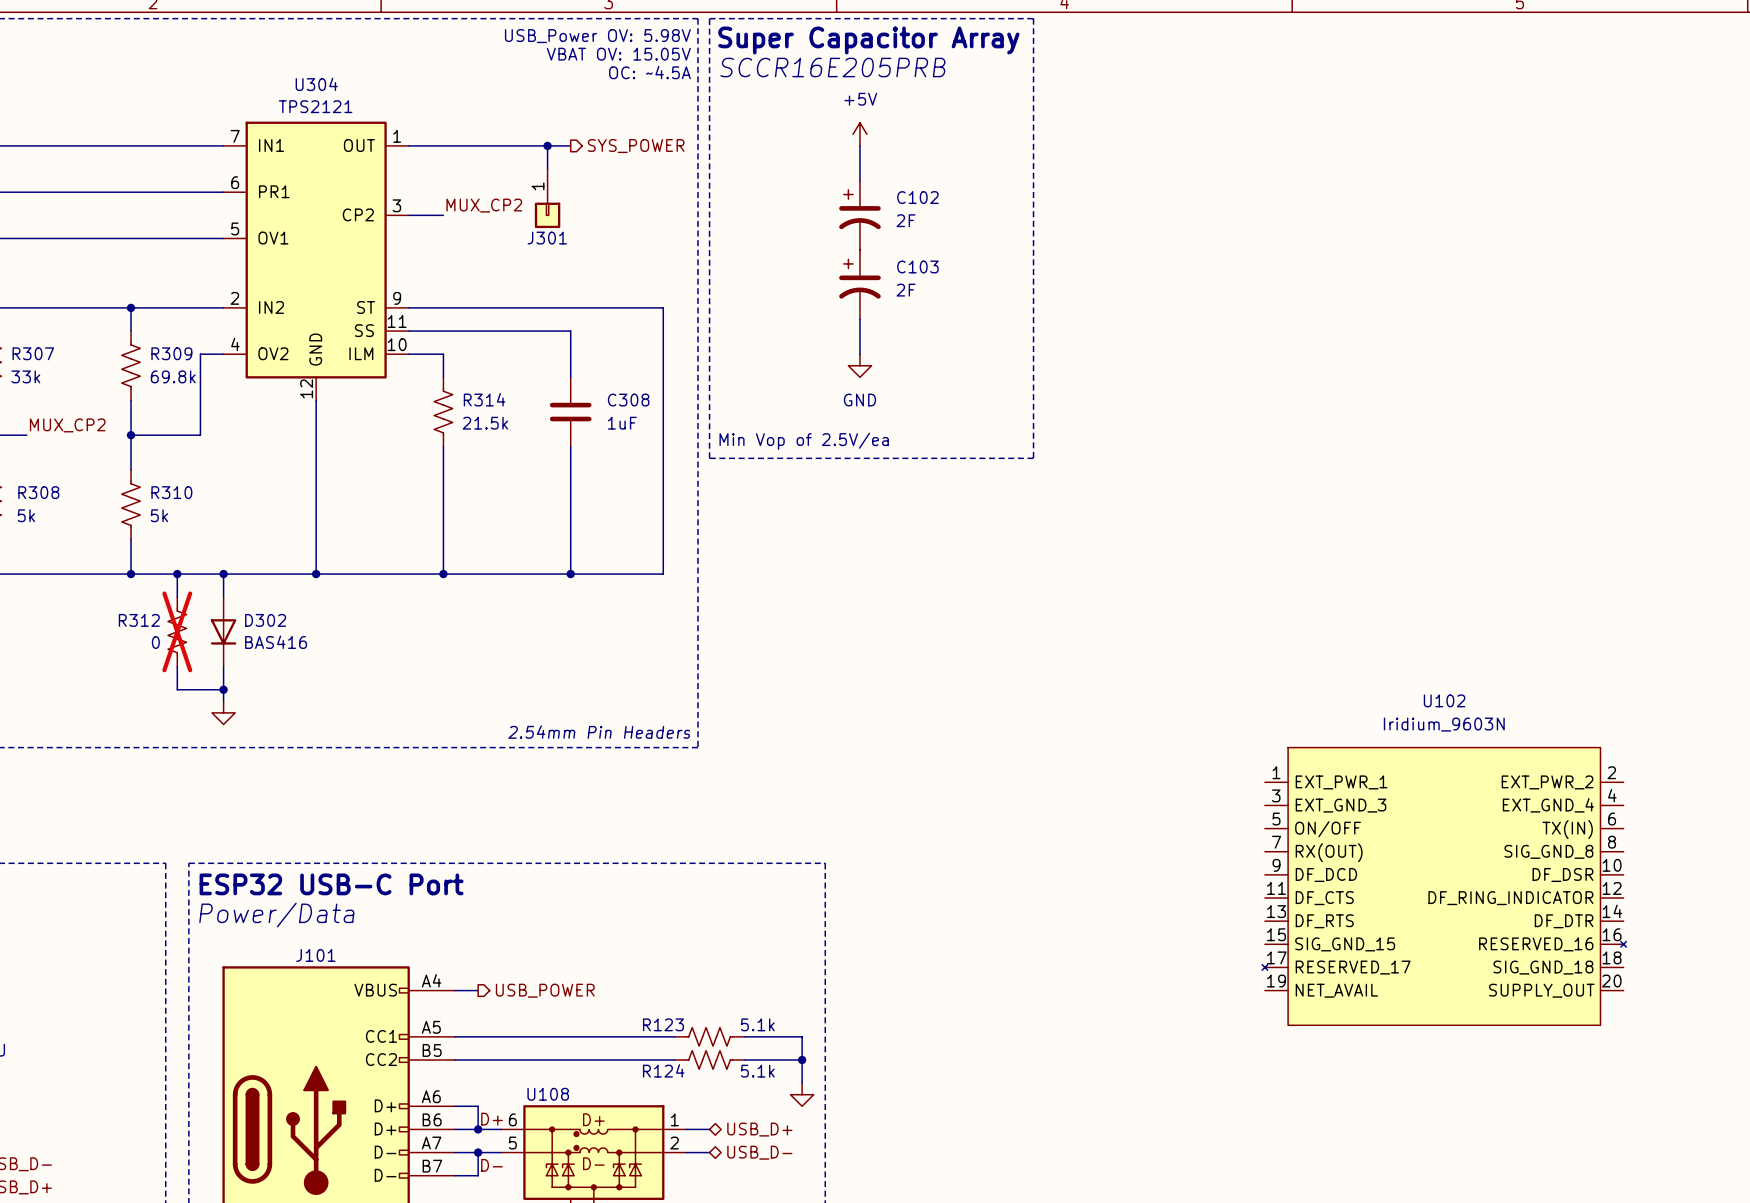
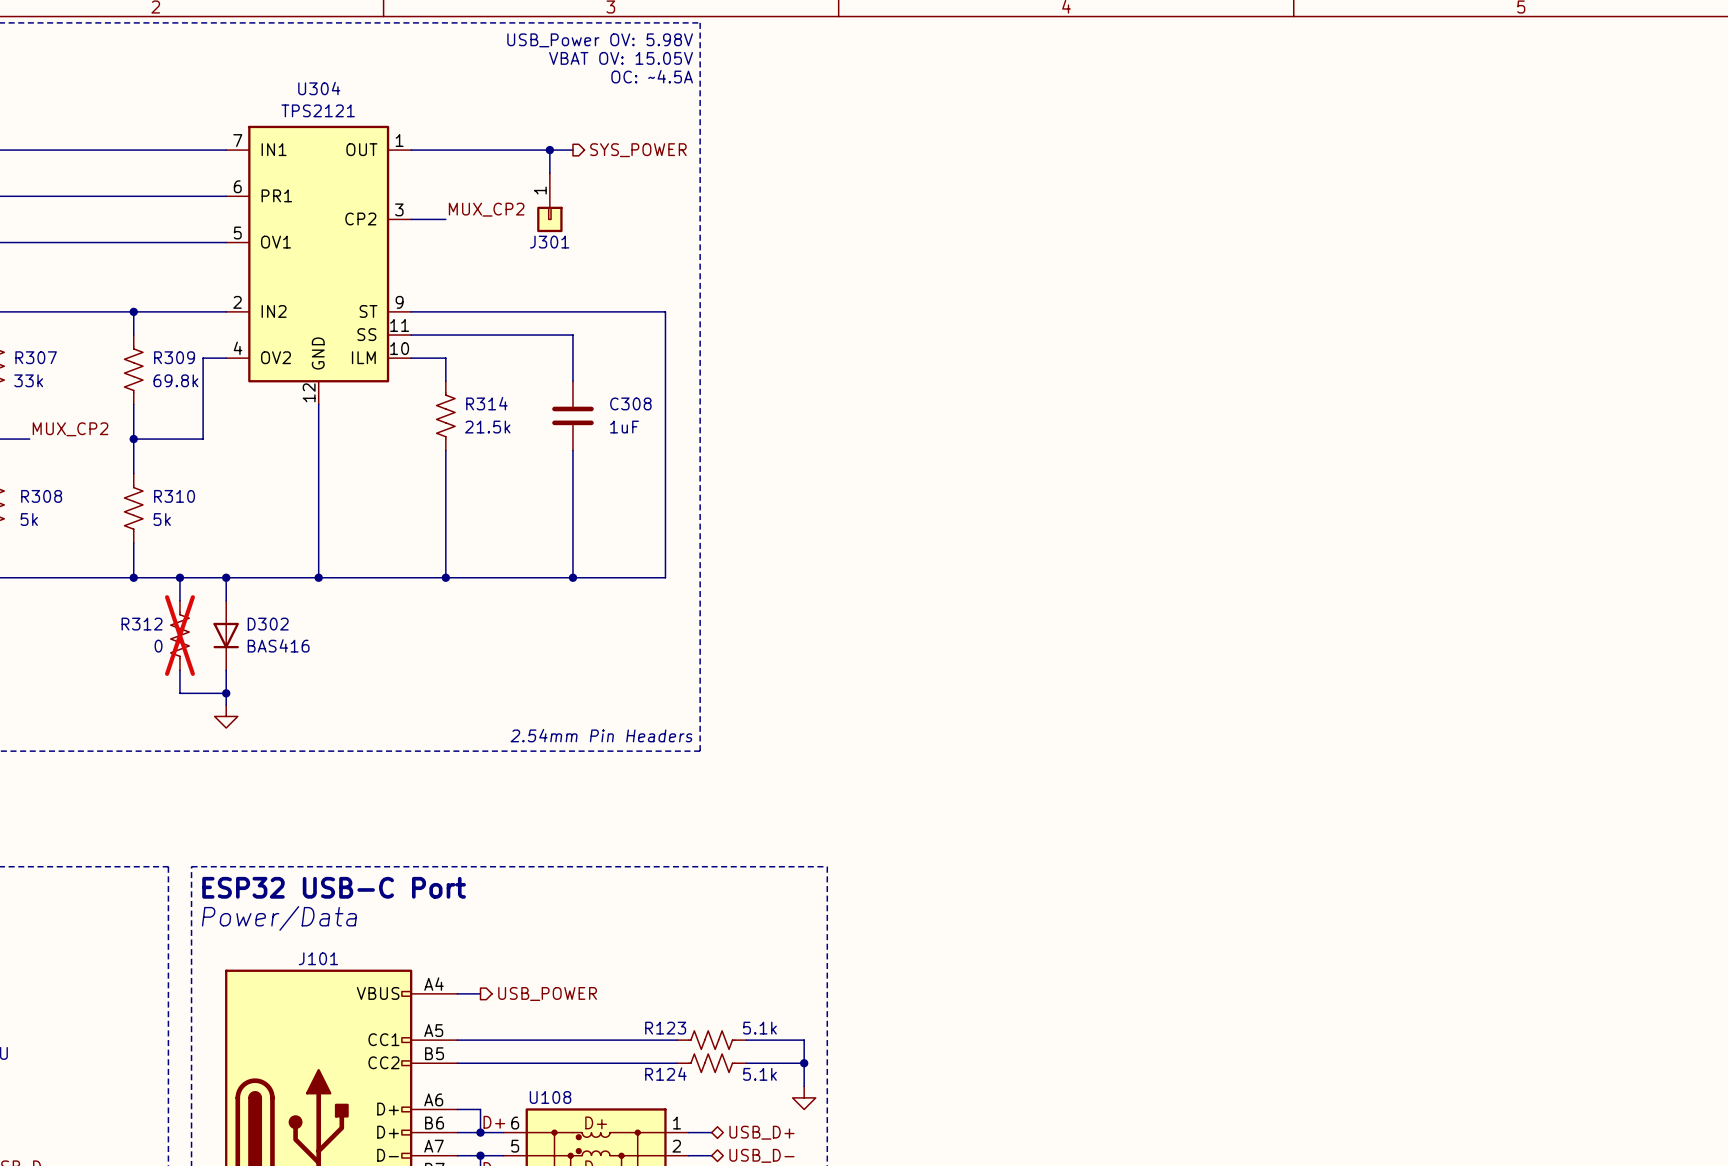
line: (709, 18) (1033, 18) (1033, 458) (709, 458) (709, 18) -> none
text: Super Capacitor Array (868, 40) -> none
text: SCCR16E205PRB (832, 67) -> none
power symbol: +5V (859, 134) -> none
wire: (859, 145) (859, 180) -> none
C102: 2F (859, 215) -> none
C103: 2F (859, 284) -> none
wire: (859, 319) (859, 354) -> none
power symbol: GND (859, 365) -> none
text: Min Vop of 2.5V/ea (804, 441) -> none
U102: Iridium_9603N (1444, 886) -> none

